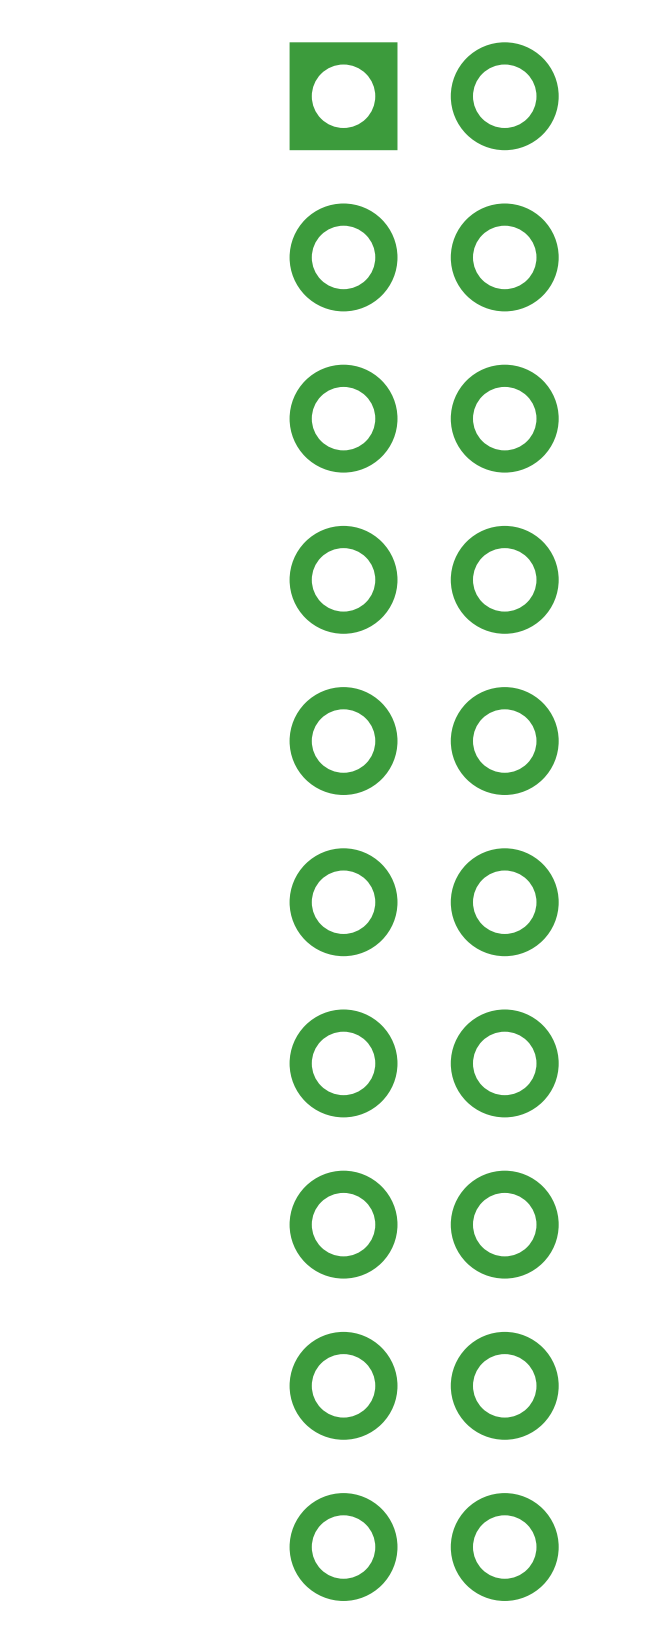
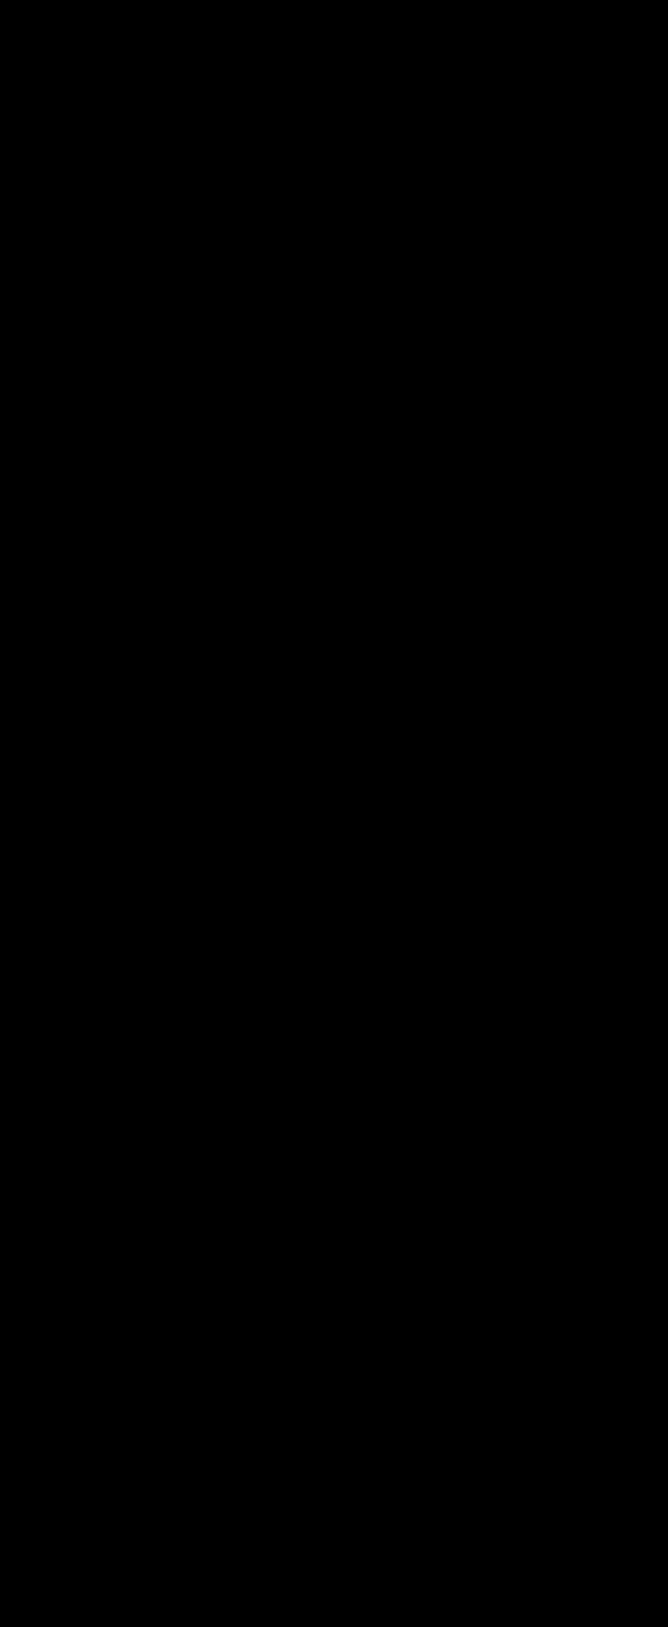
part: (424, 821) -> none

